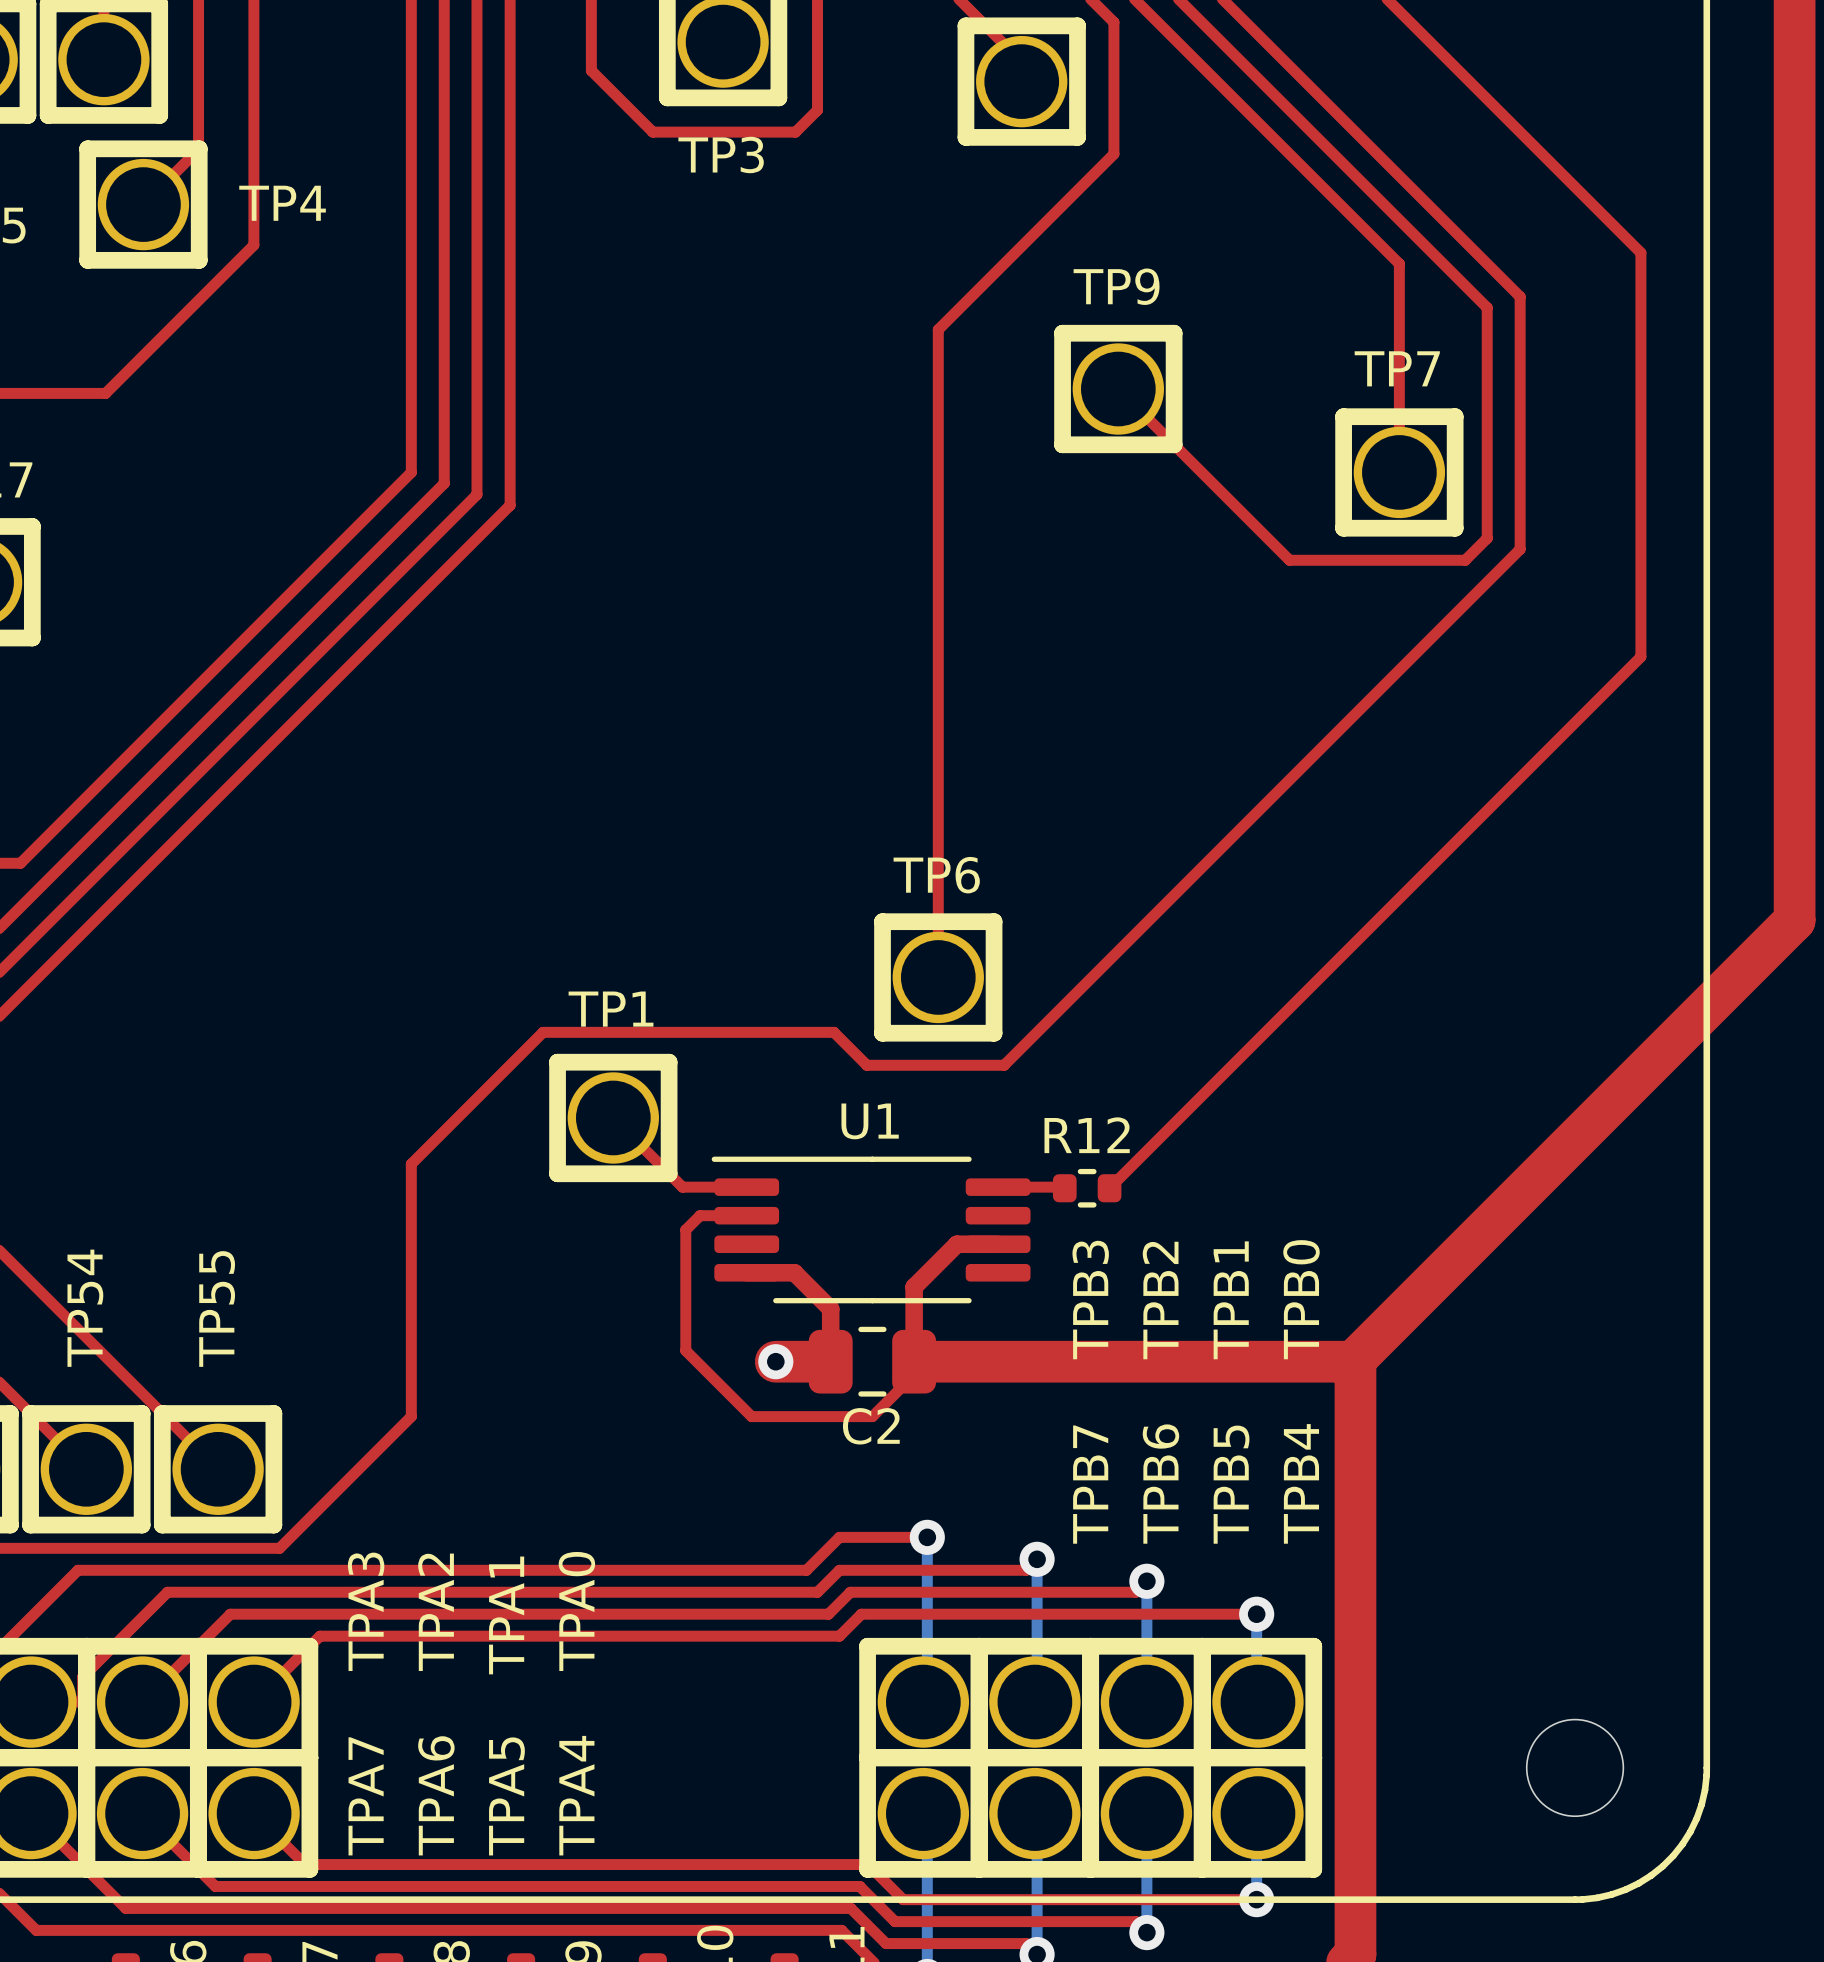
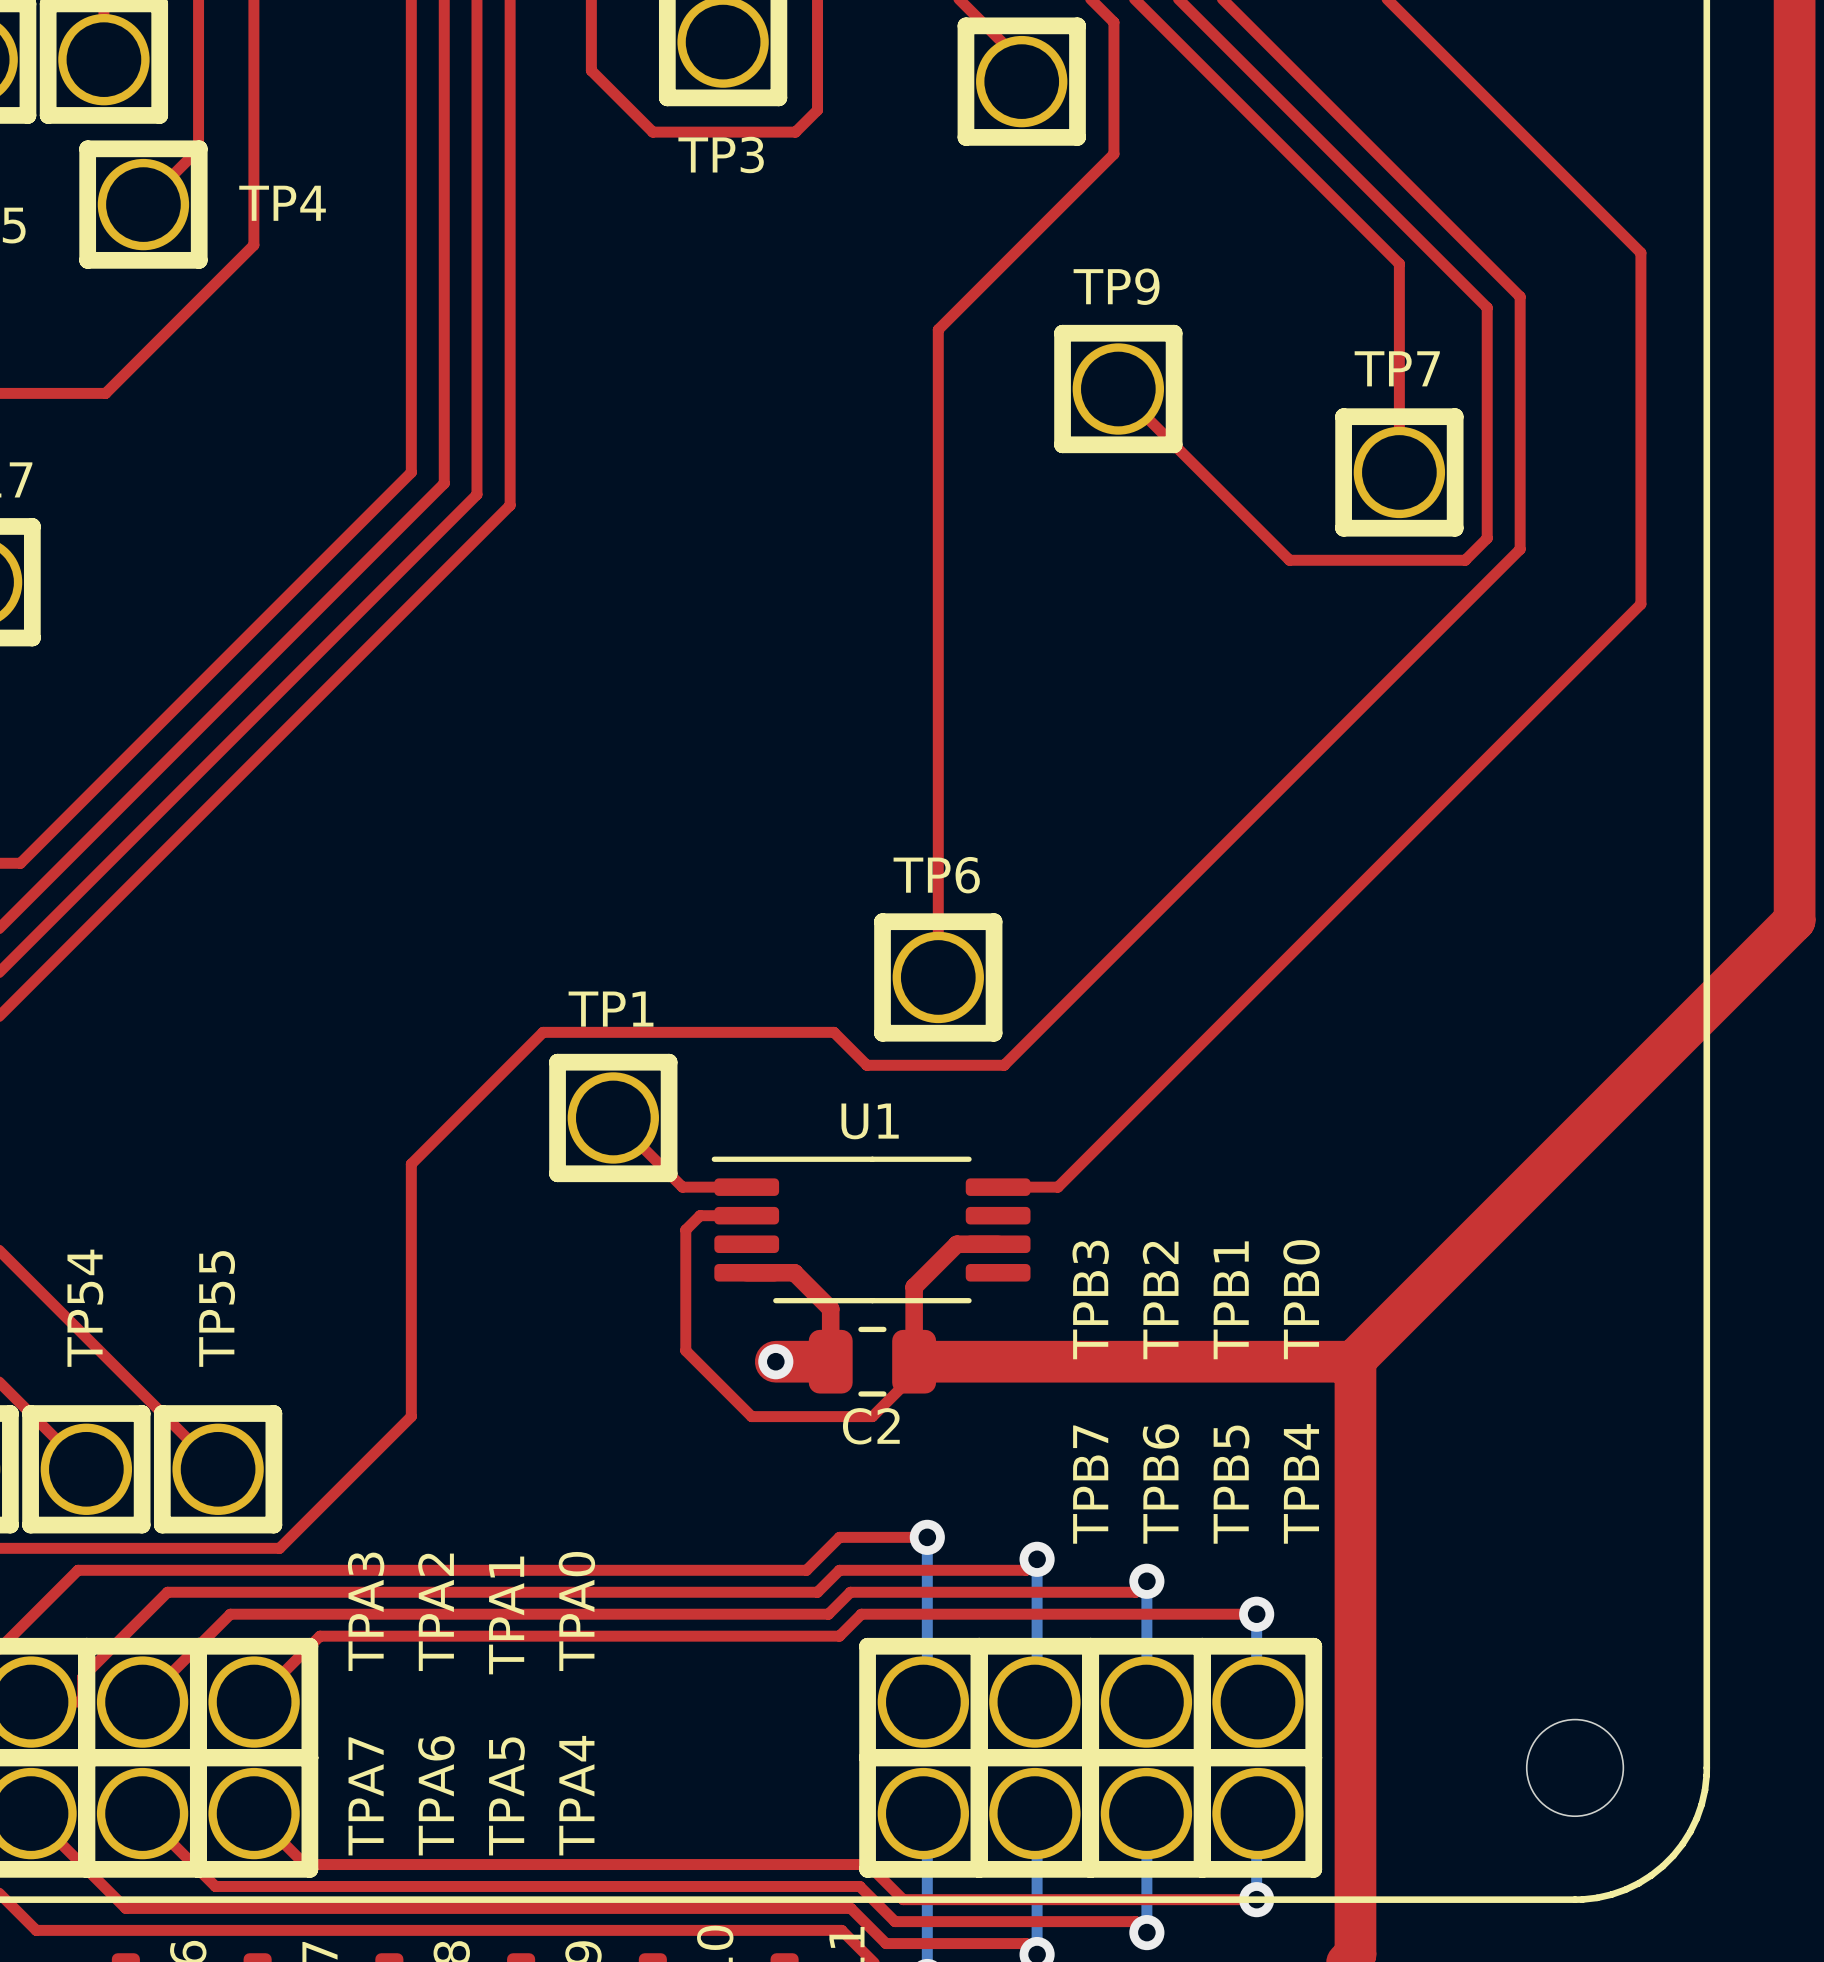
top track: (1640, 604) (1640, 656) (1109, 1188) -> (1640, 604) (1057, 1187)
R12: (1087, 1188) -> none

